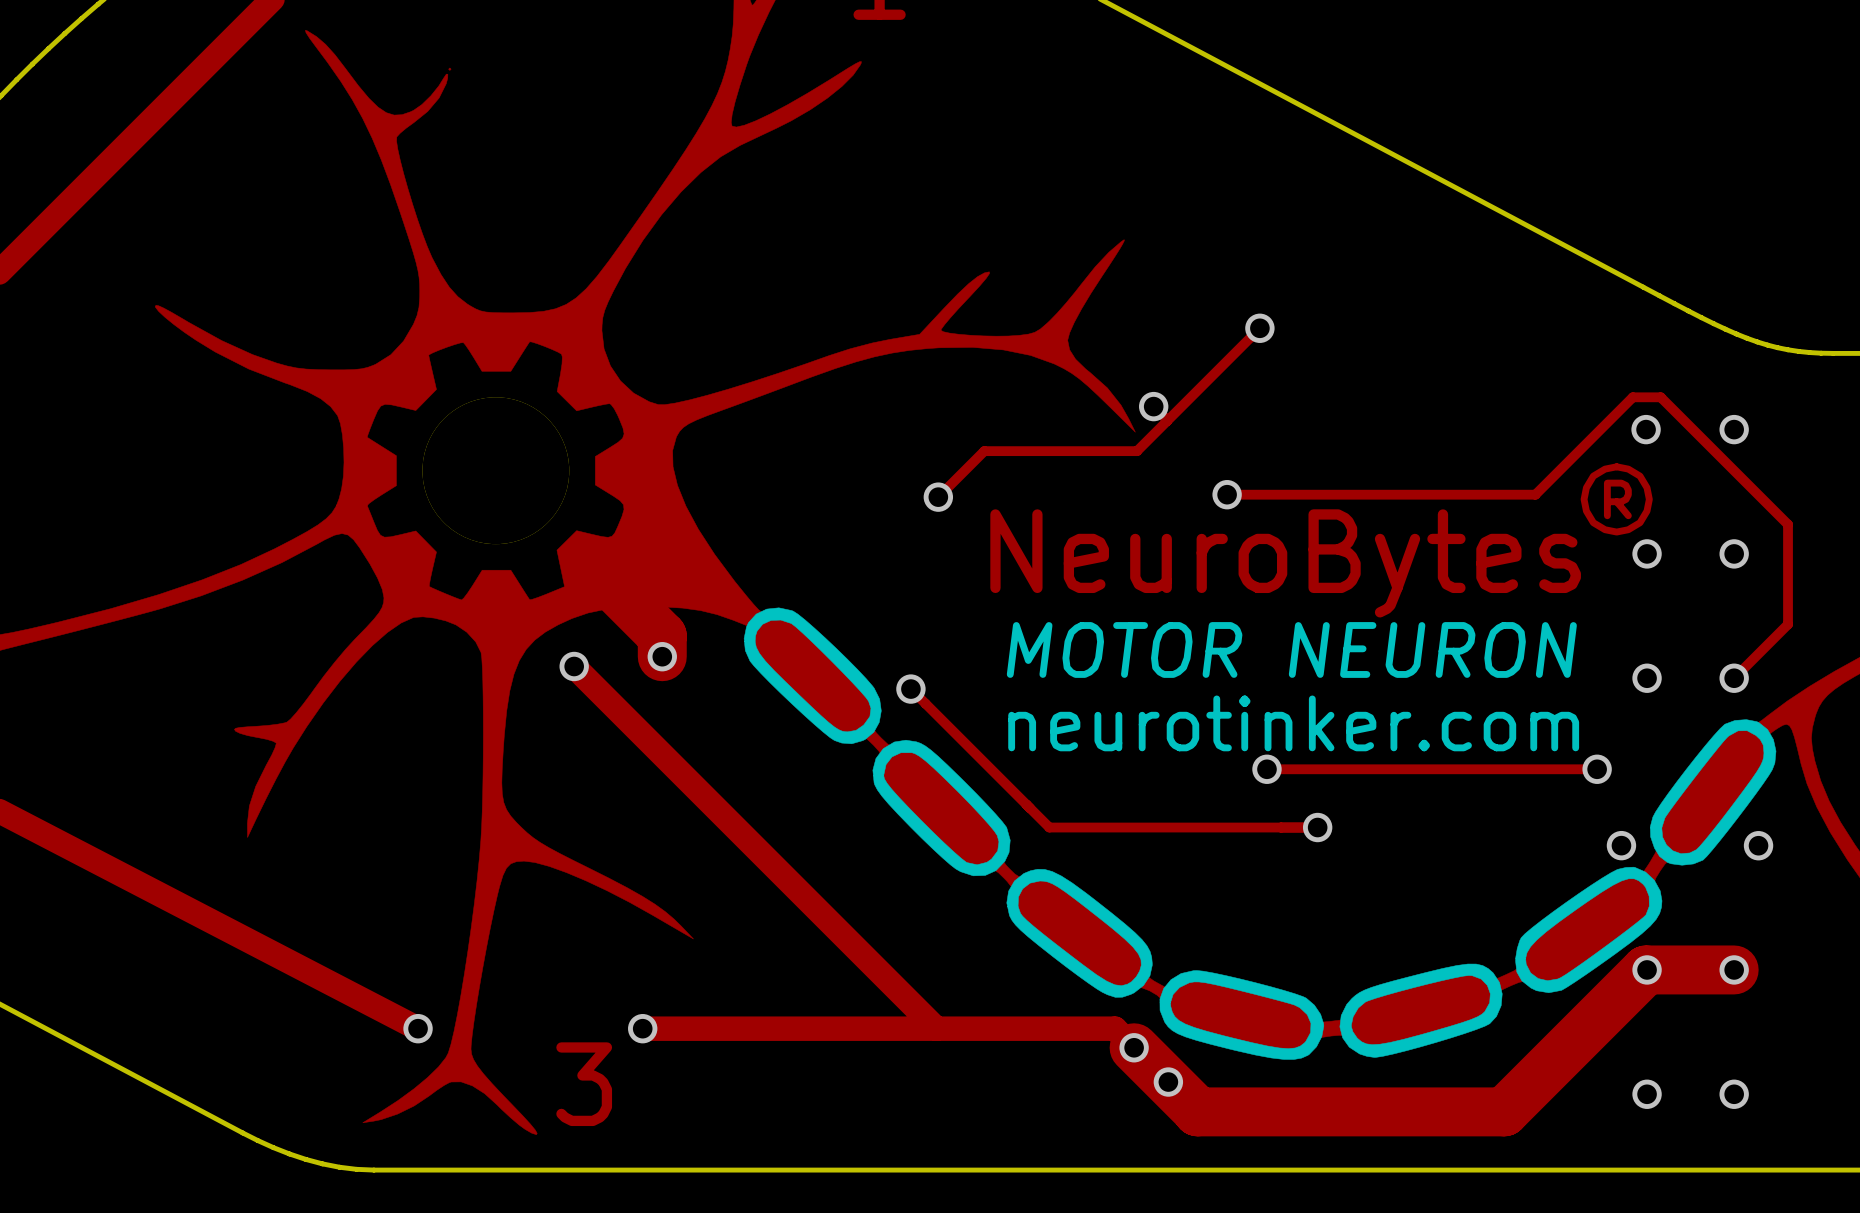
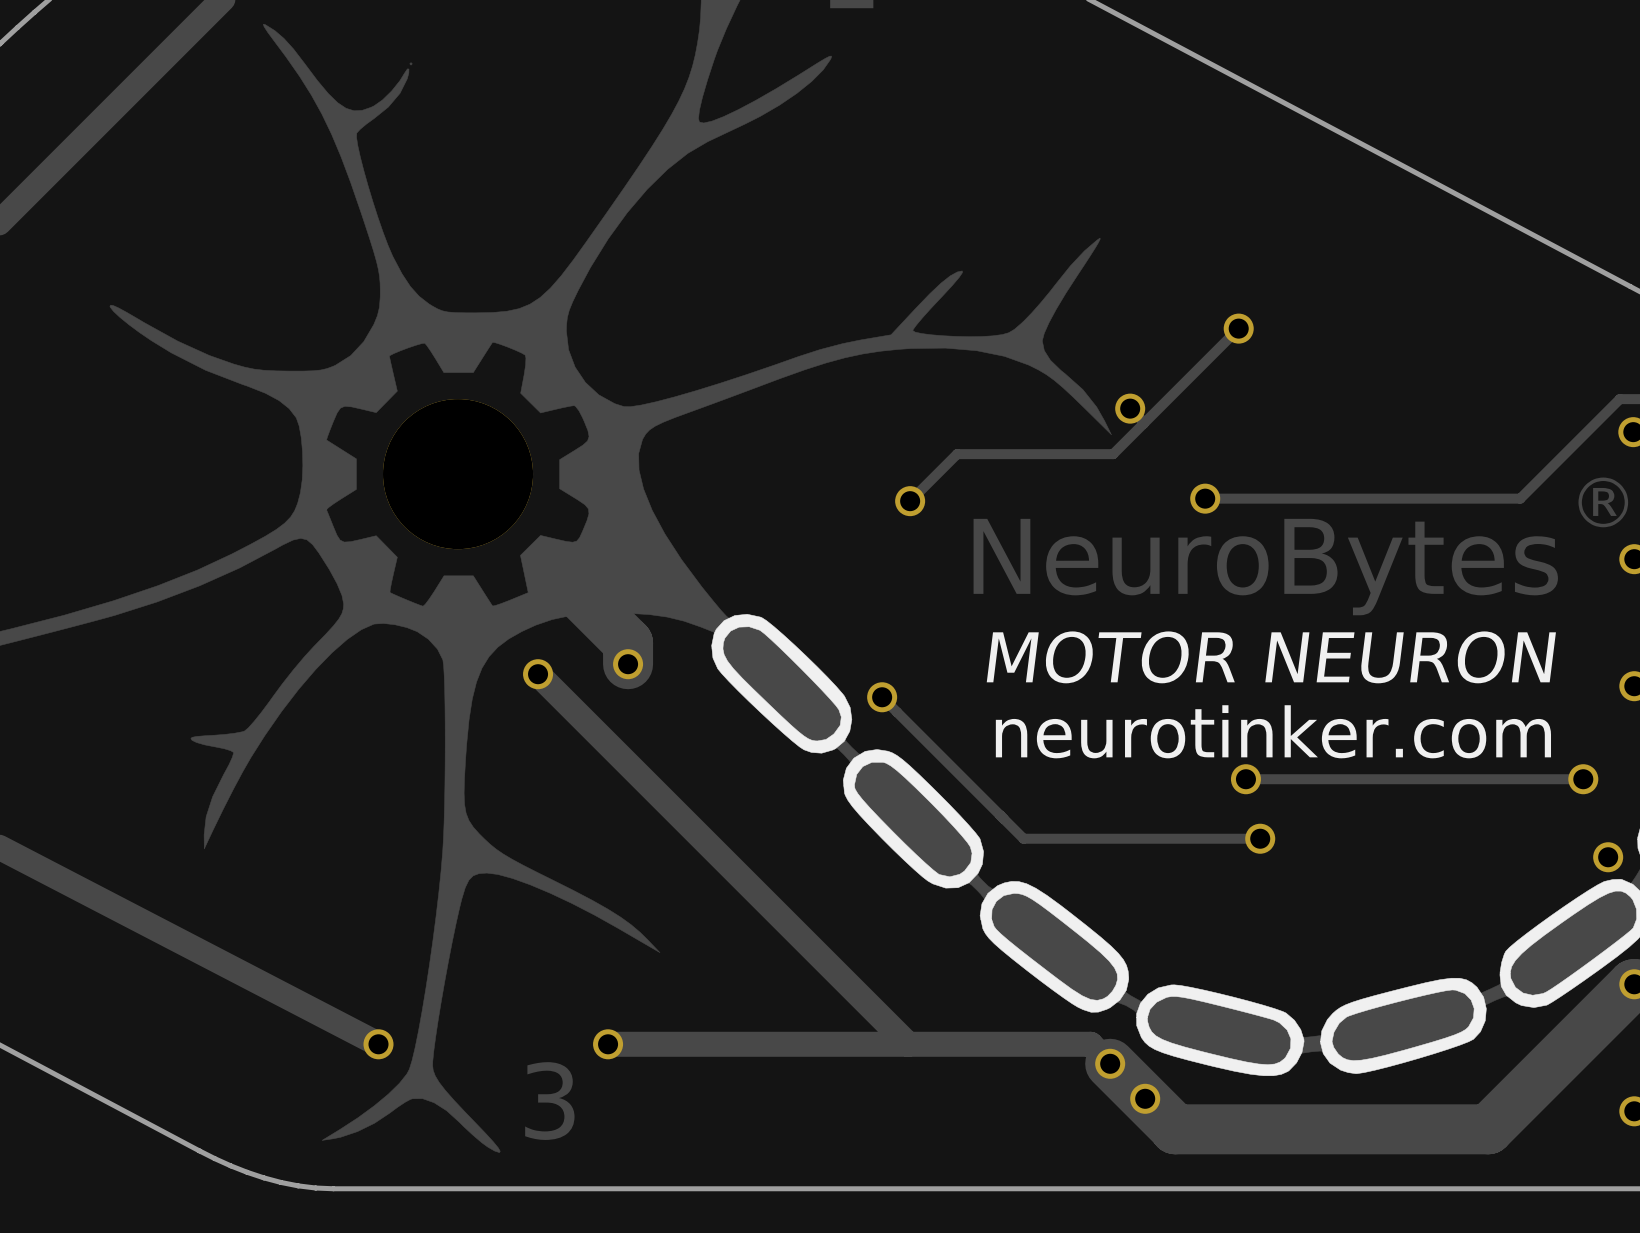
track: (1280, 827) (1317, 827) -> none
via position: (1317, 827) -> (1260, 838)

